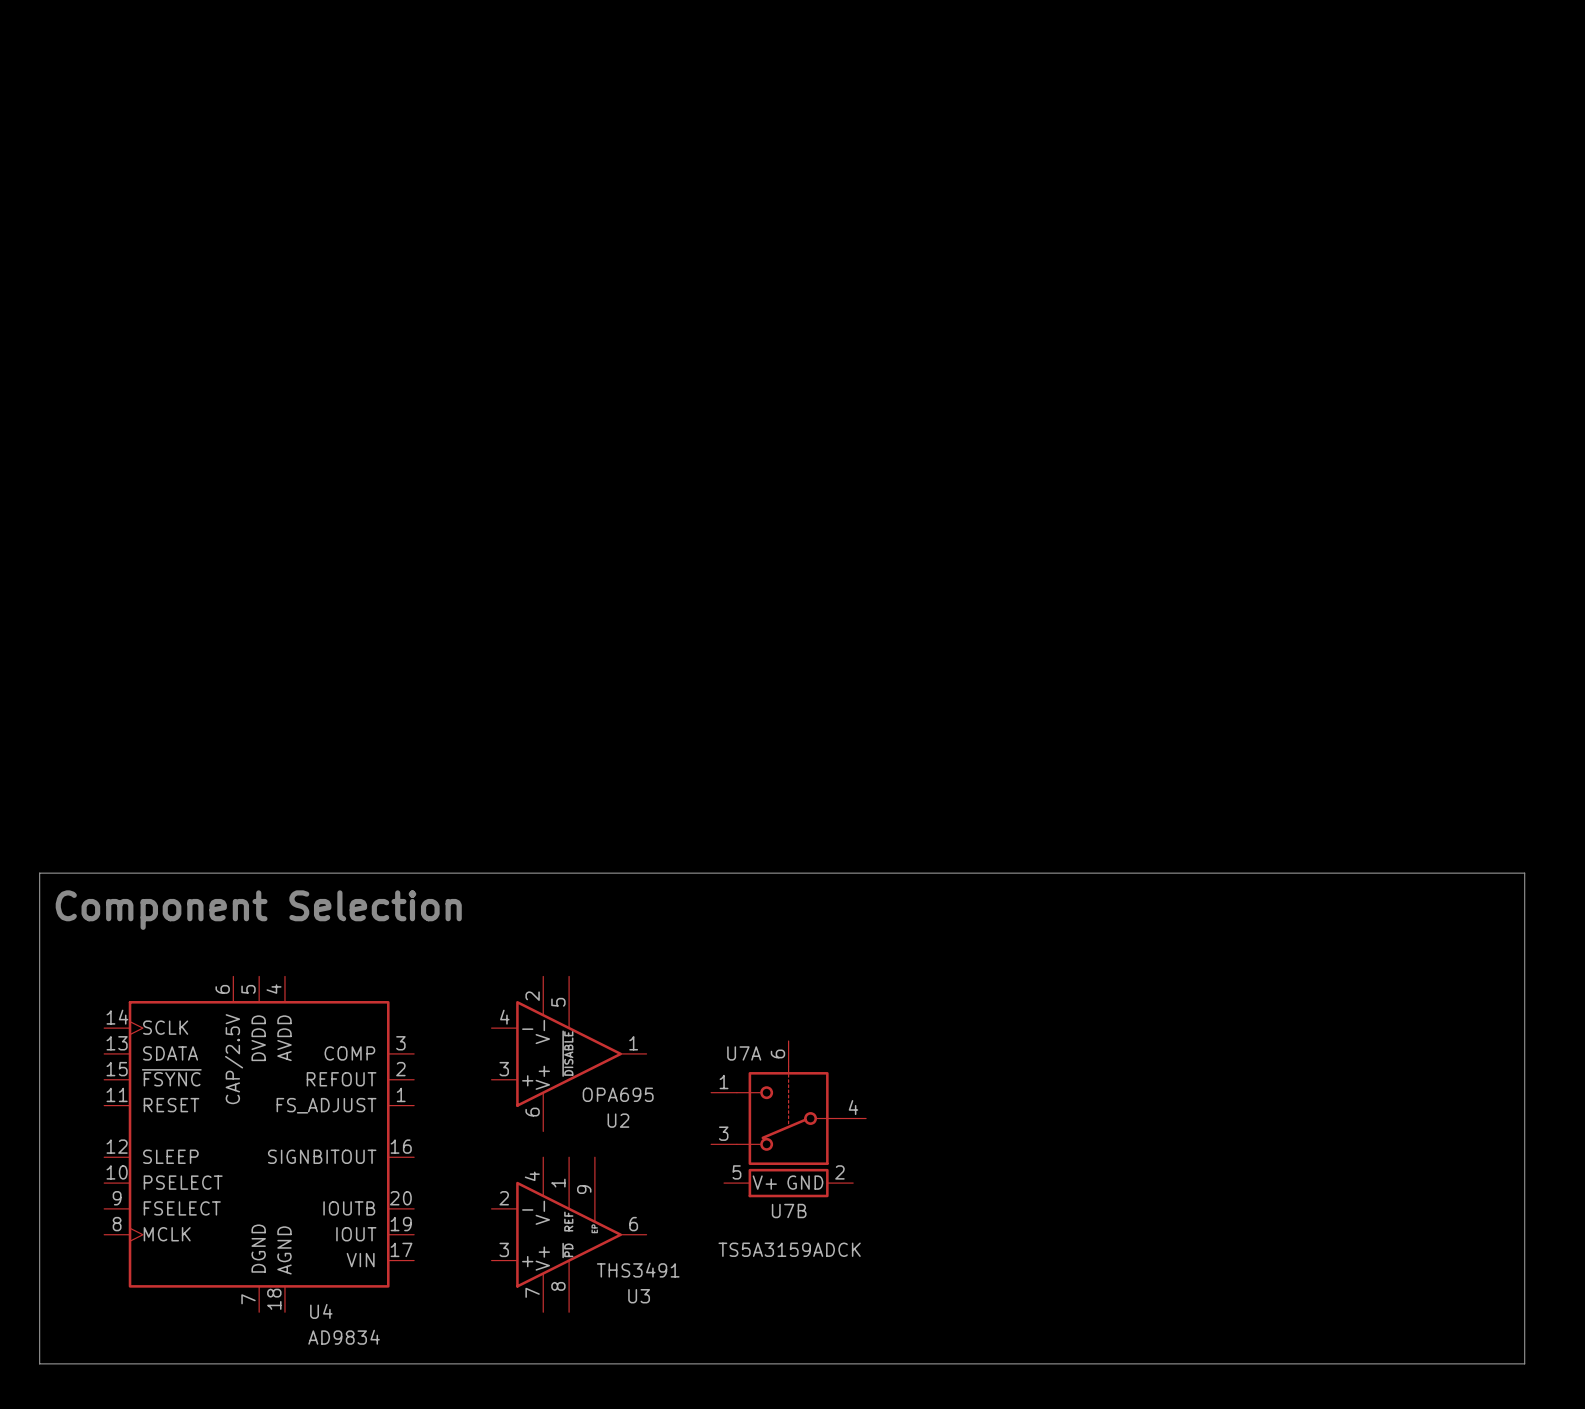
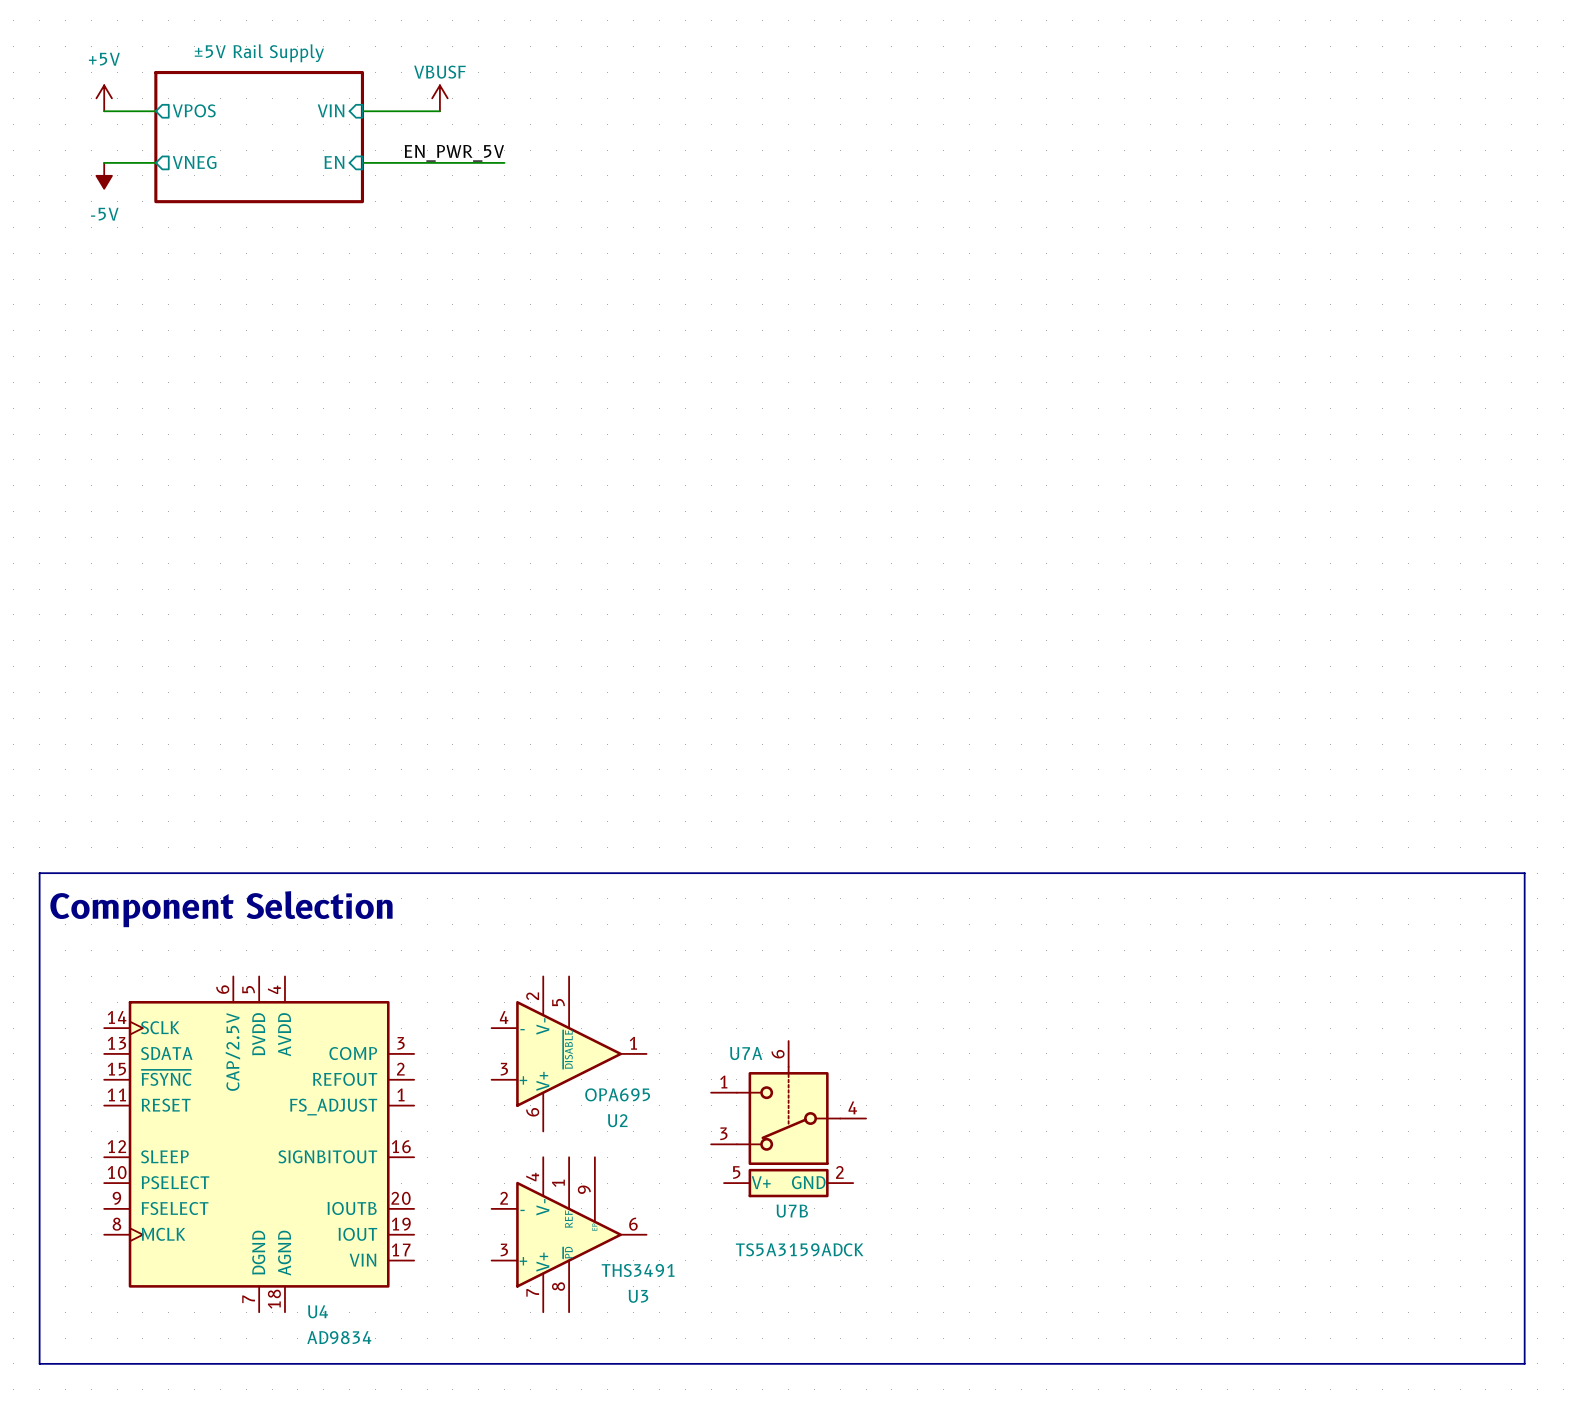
power symbol: none -> +5V (104, 98)
power symbol: none -> VBUSF (439, 98)
sheet pin: none -> VPOS (194, 110)
sheet pin: none -> VIN (331, 110)
wire: none -> (104, 111) (155, 111)
wire: none -> (362, 111) (439, 111)
sheet ±5V Rail Supply: none -> (259, 137)
label: none -> EN_PWR_5V (454, 153)
wire: none -> (104, 162) (155, 162)
sheet pin: none -> VNEG (194, 162)
sheet pin: none -> EN (334, 162)
wire: none -> (362, 162) (504, 162)
power symbol: none -> -5V (104, 175)

